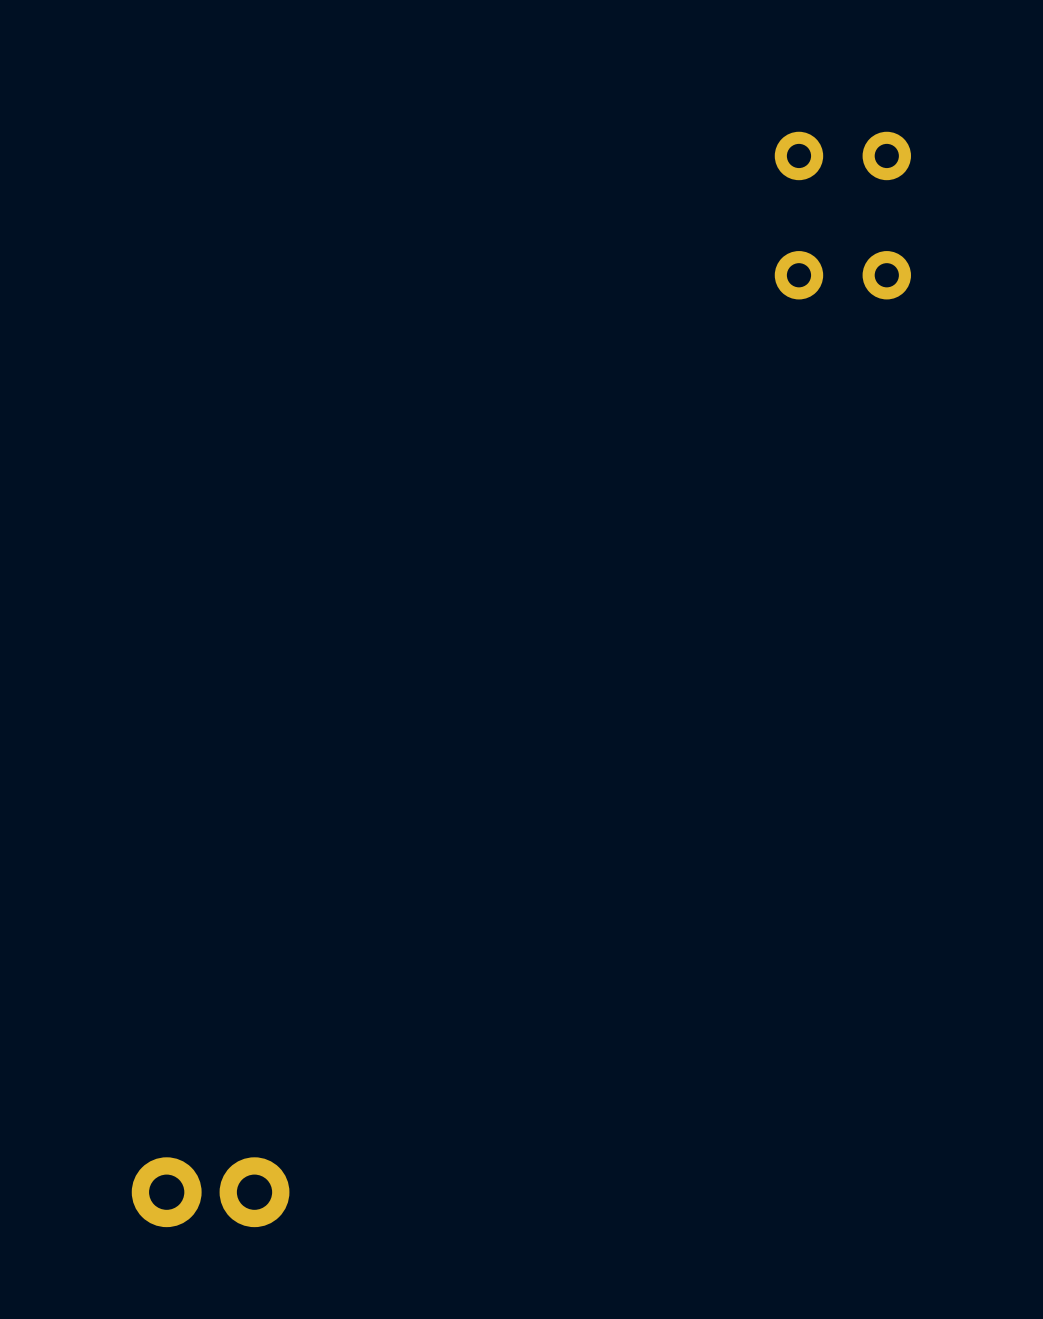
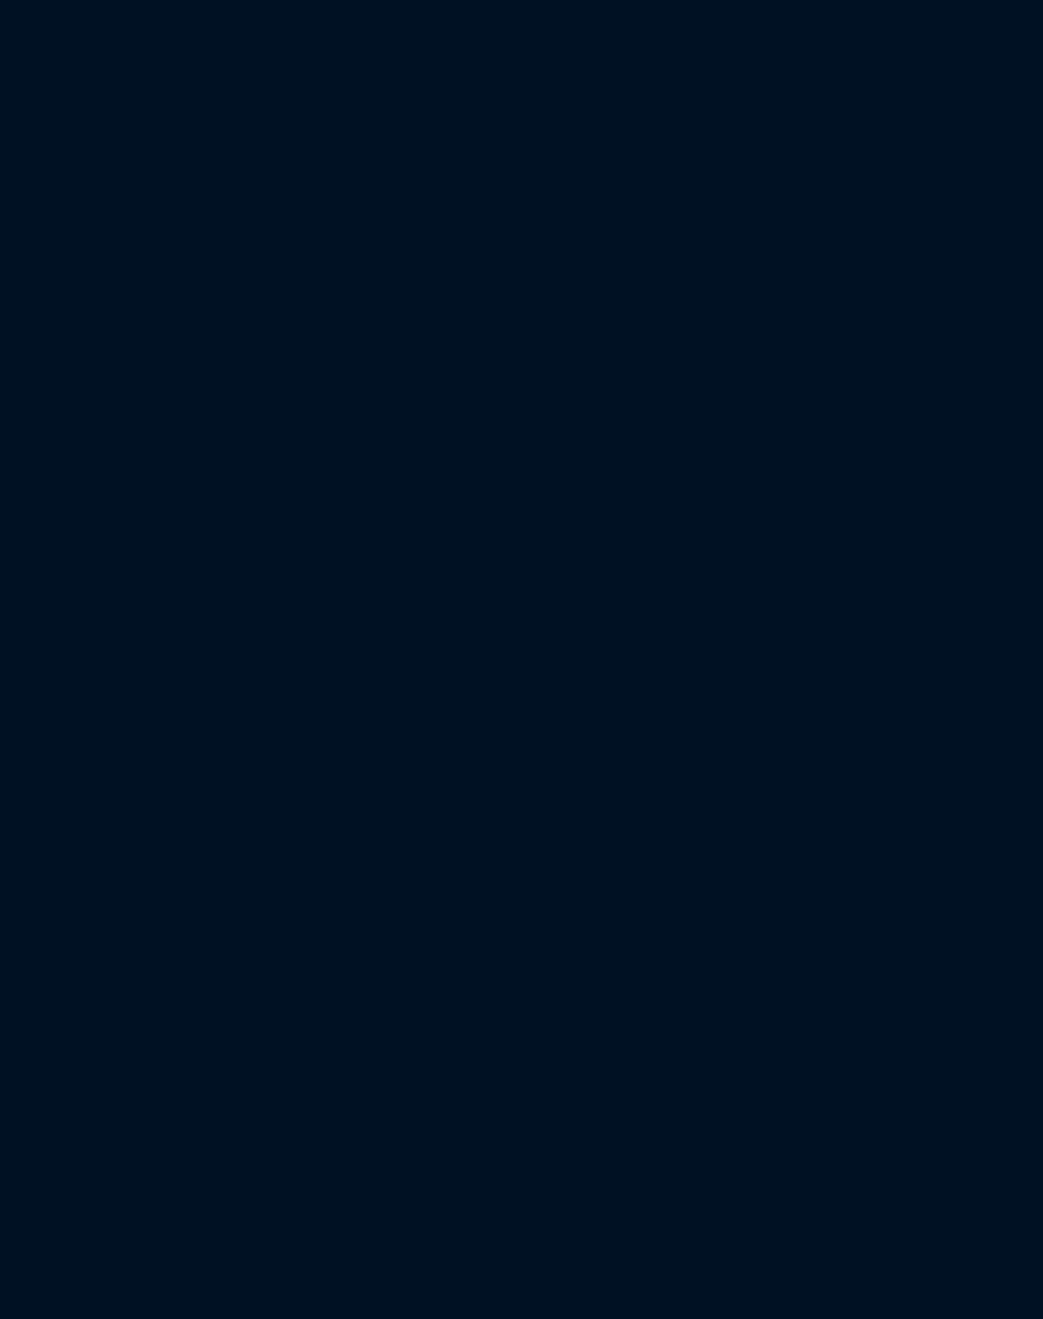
part: (842, 155) -> none
part: (842, 275) -> none
part: (210, 1192) -> none

